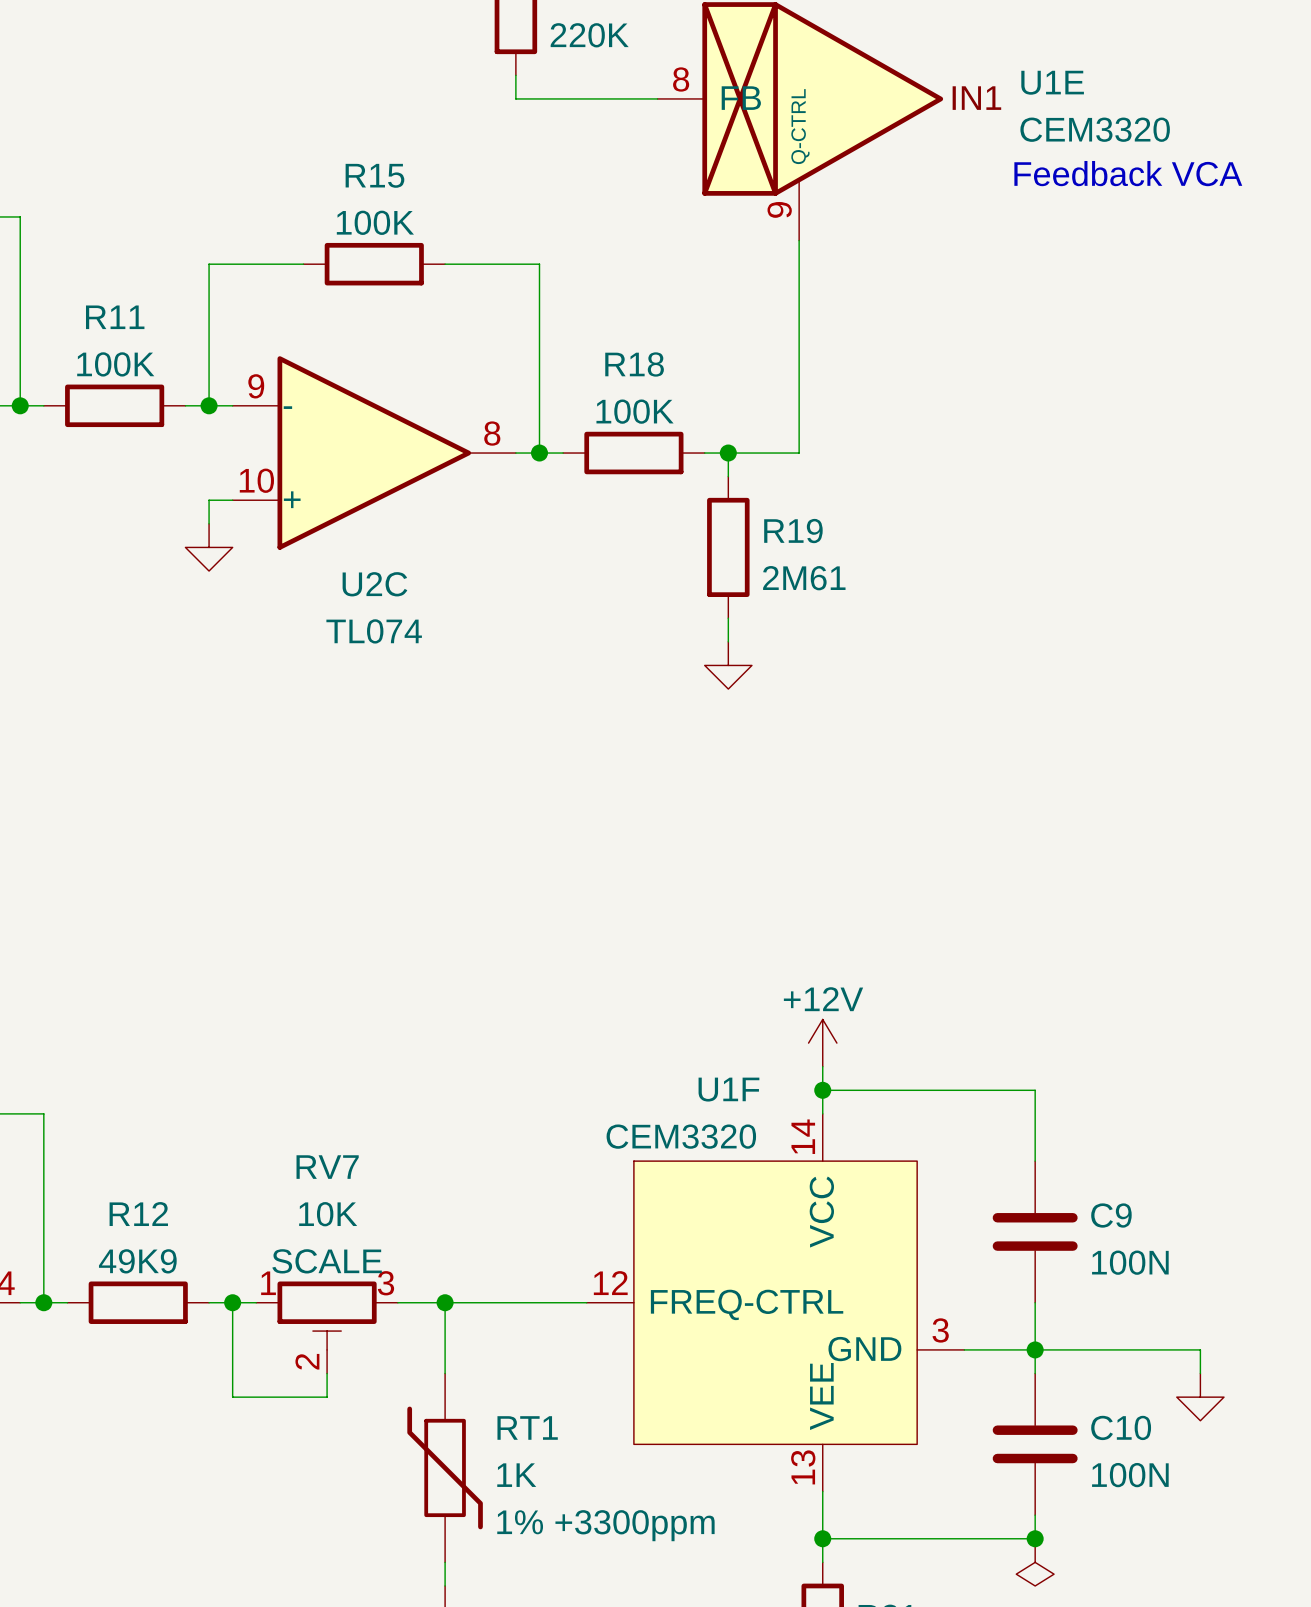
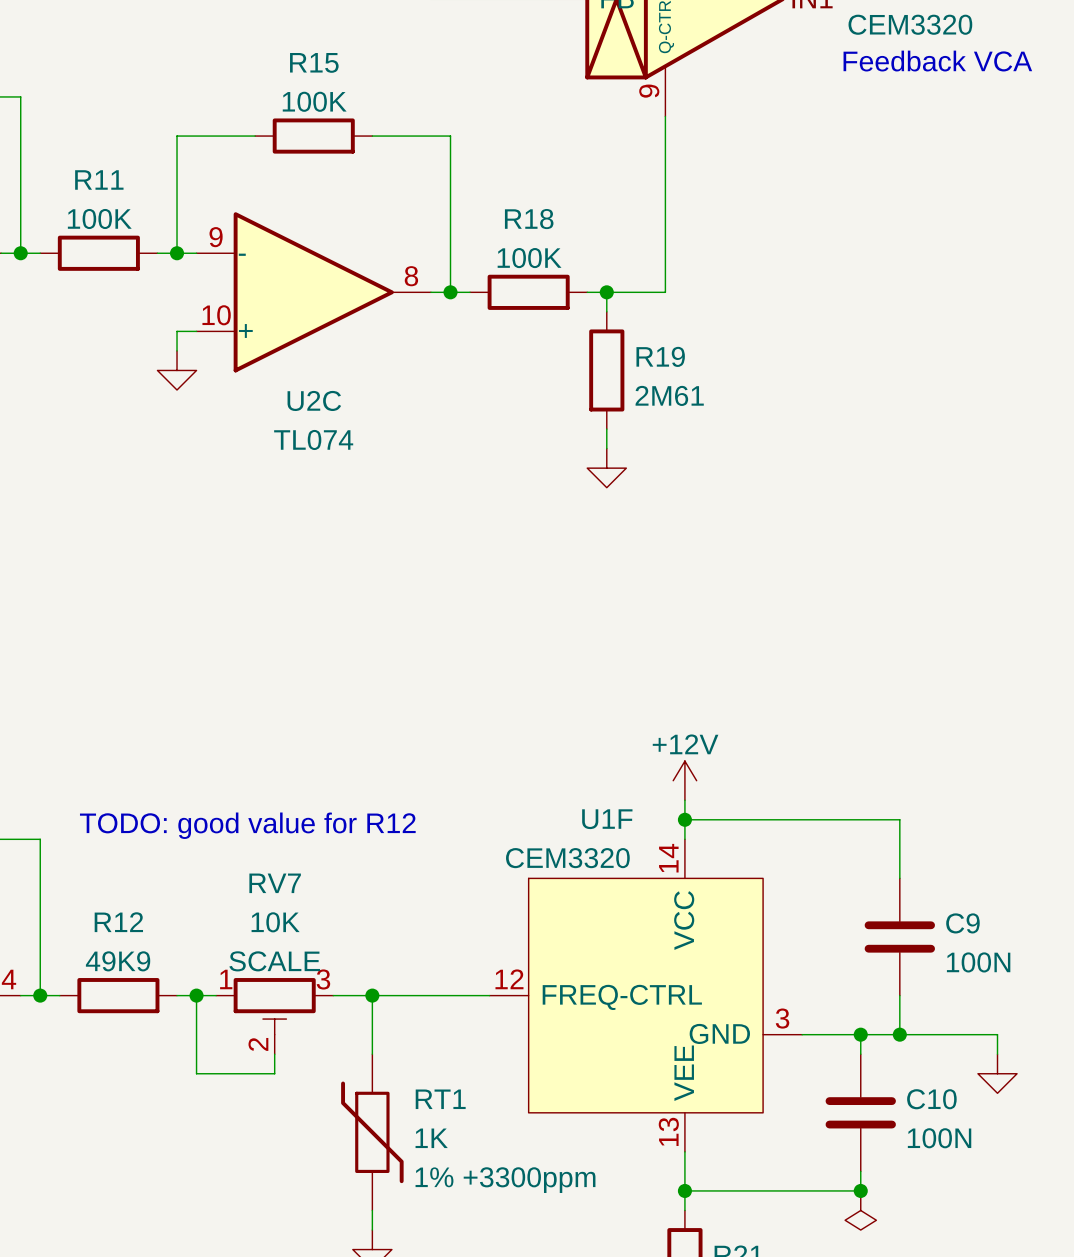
wire: (1035, 1090) (1035, 1161) -> (860, 819) (899, 819) (899, 878)
text: none -> TODO: good value for R12 (247, 825)
C9 position: (1035, 1231) -> (899, 937)
wire: (1035, 1302) (1035, 1349) -> (899, 995) (899, 1034)
junction: none -> (899, 1034)

